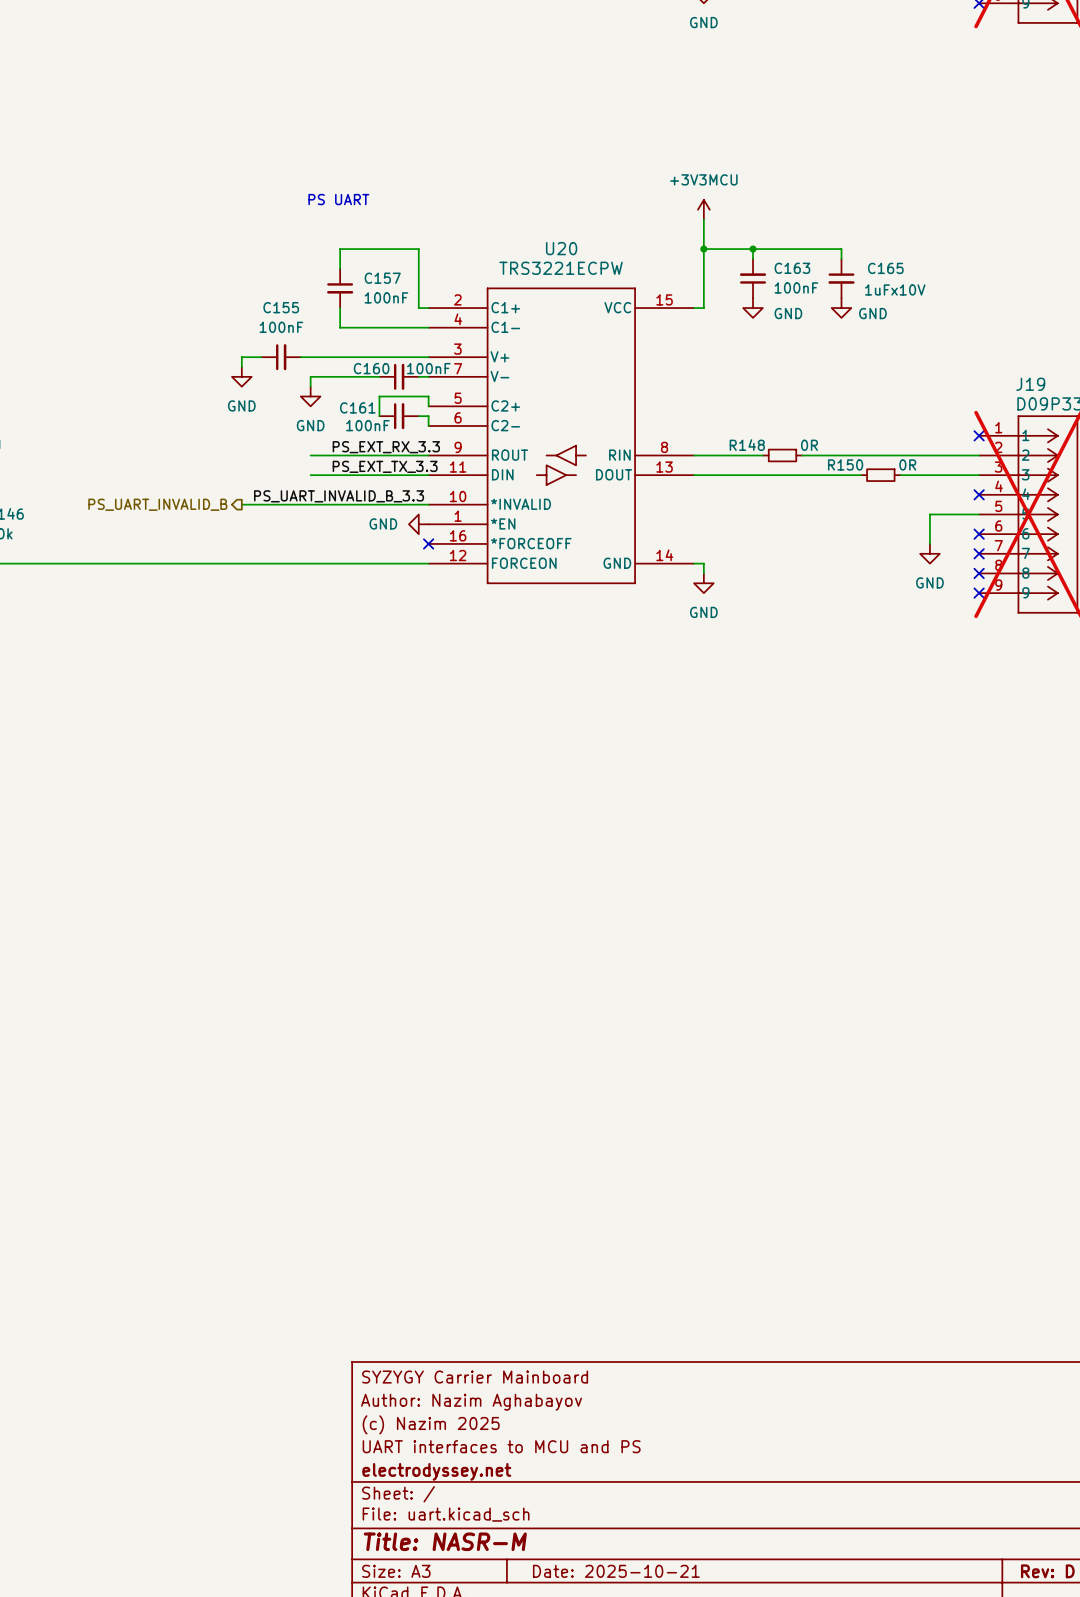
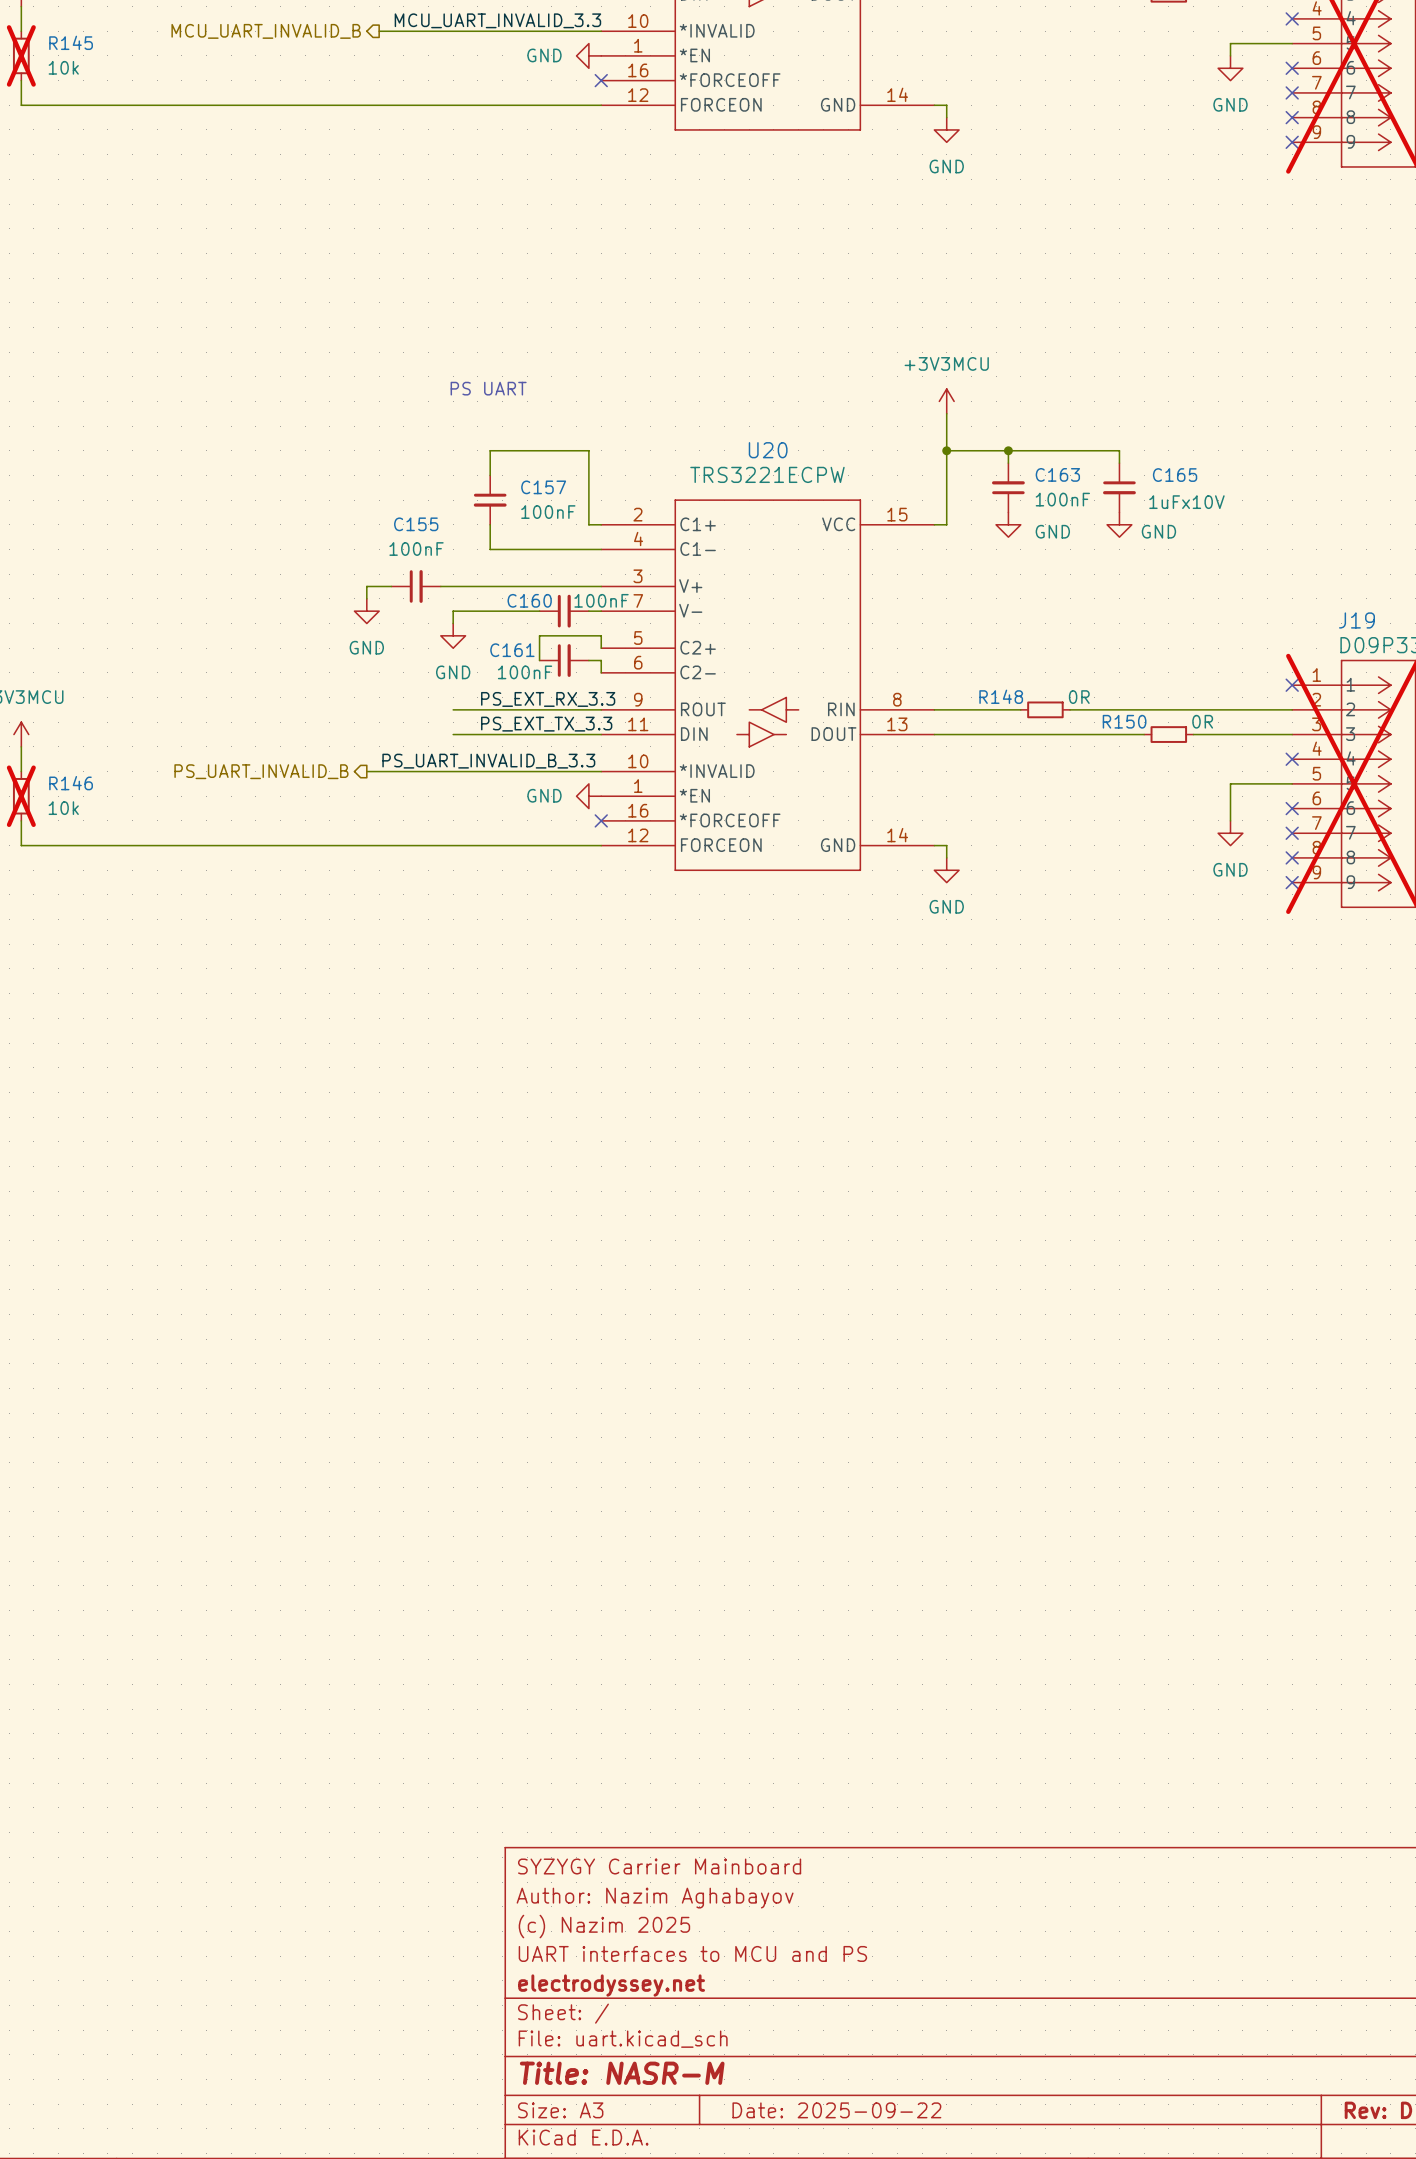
title block: Date: 2025-10-21 (616, 1571) -> Date: 2025-09-22 (836, 2110)

